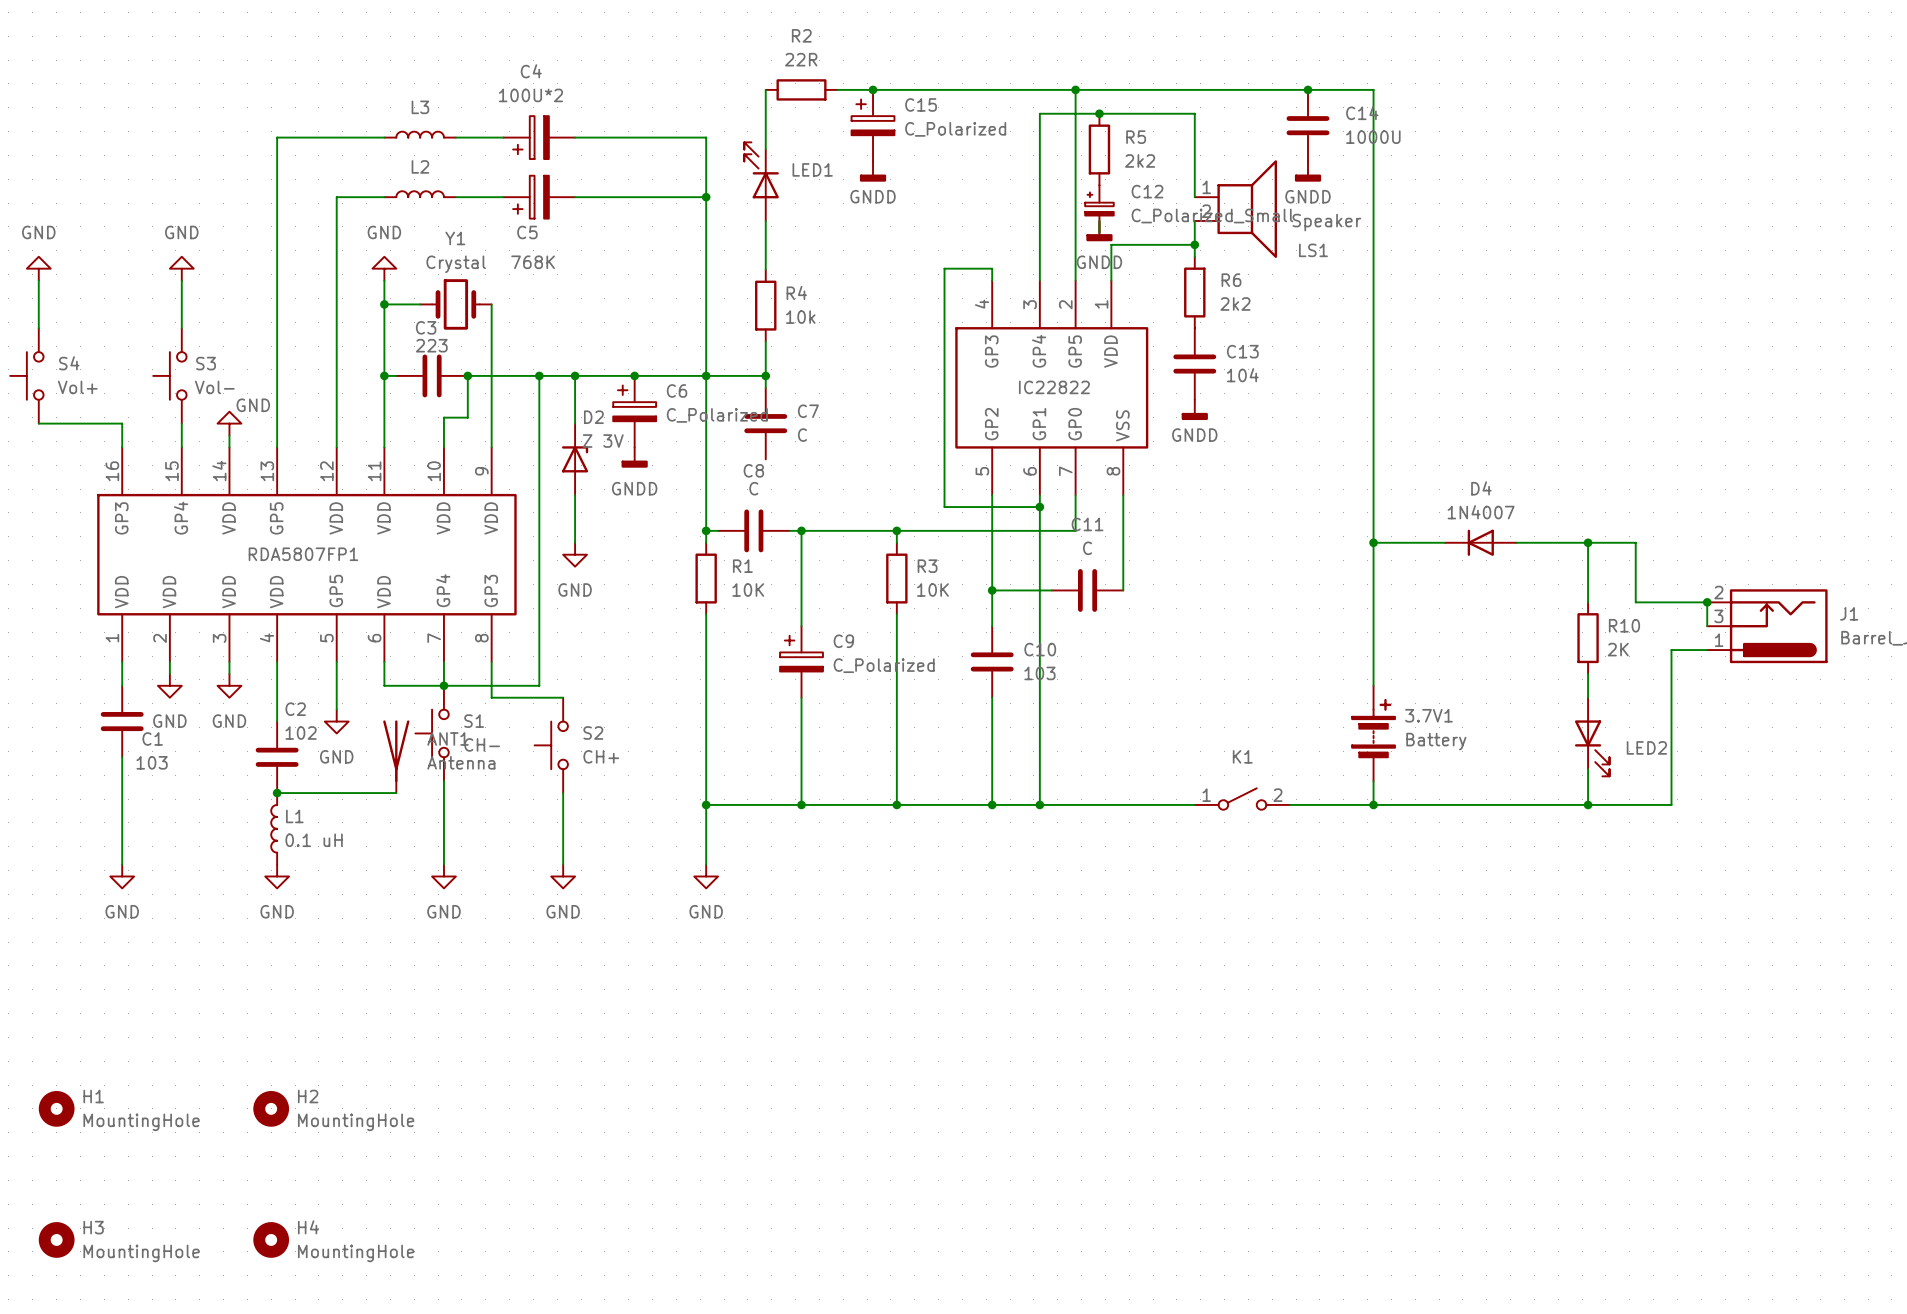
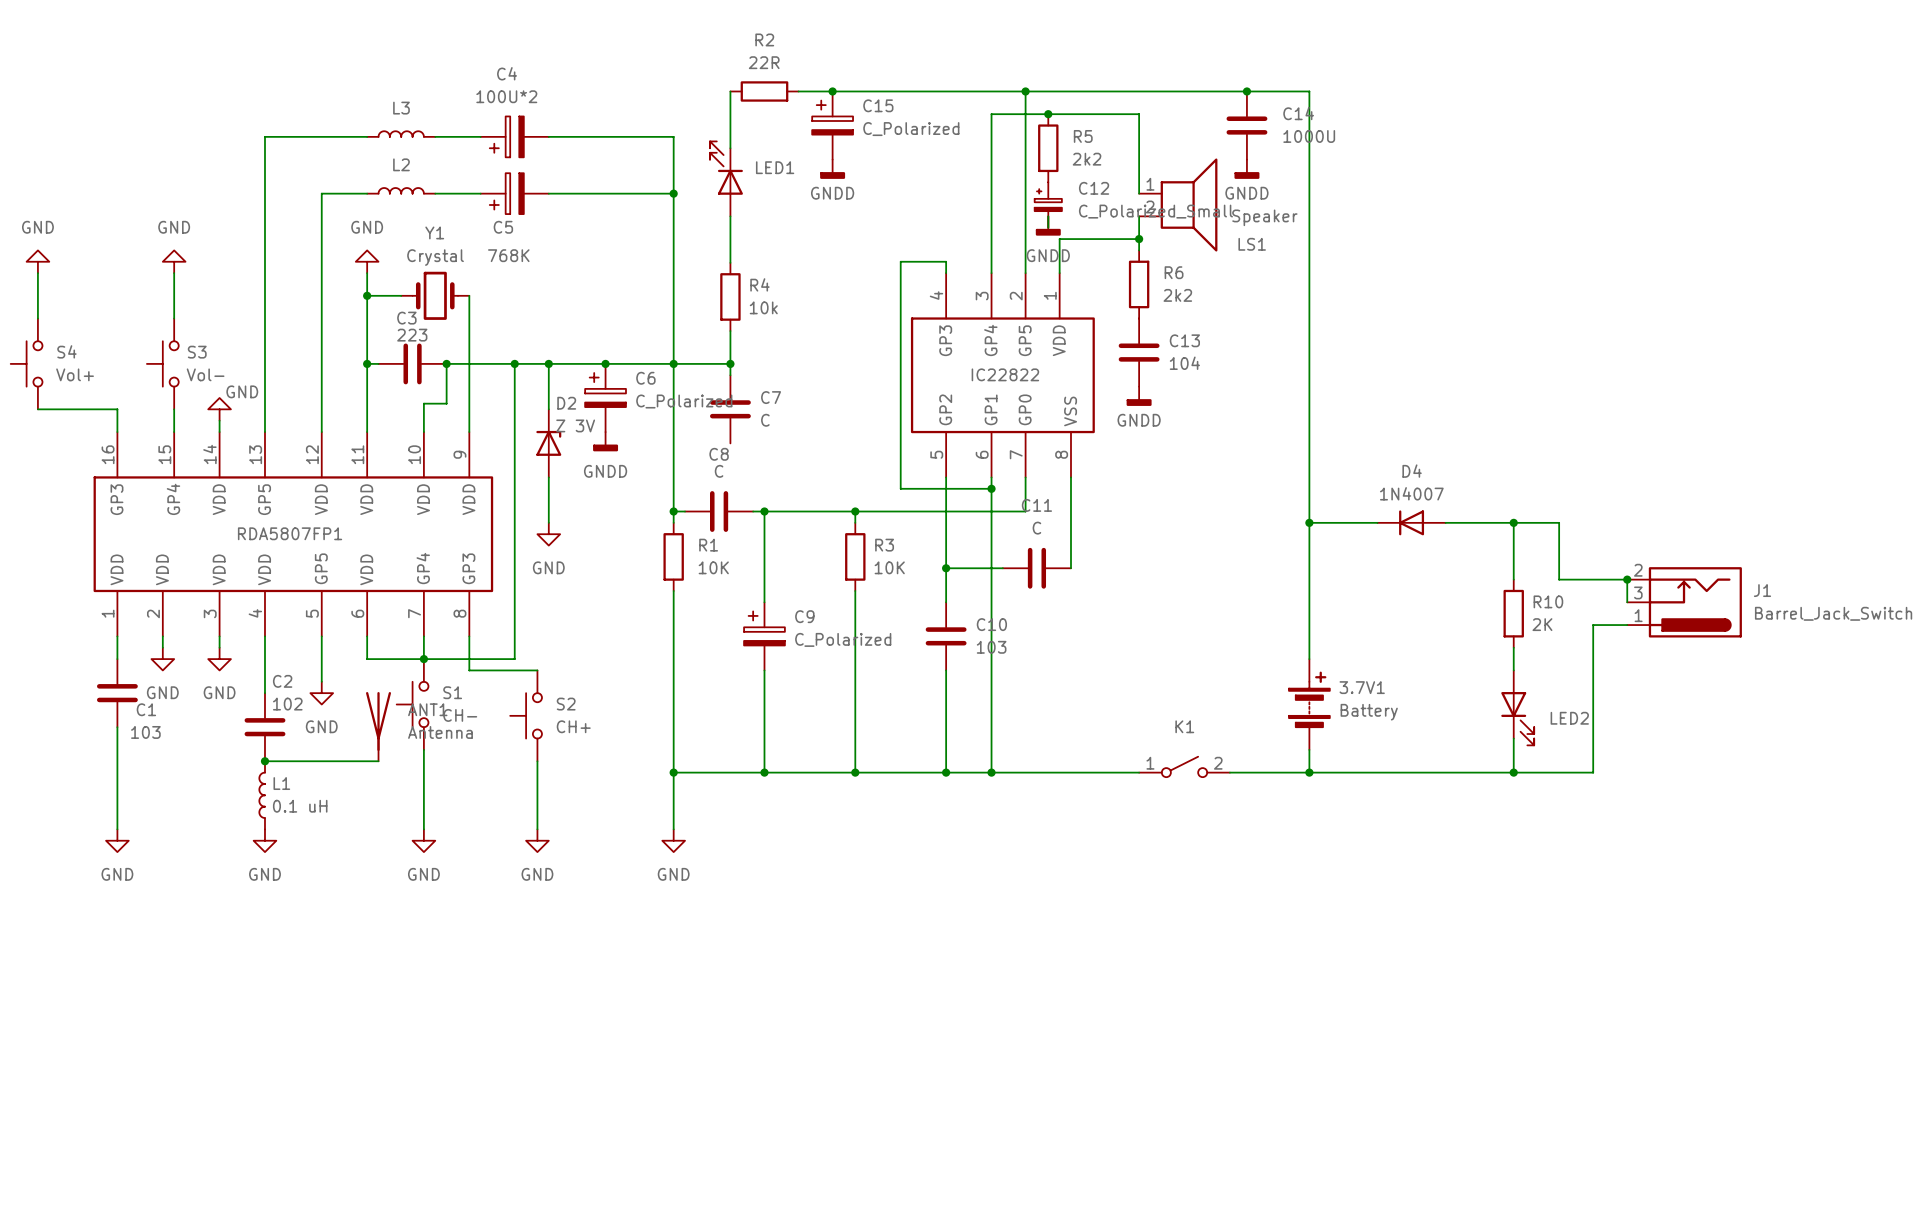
H1: MountingHole (56, 1108) -> none
H2: MountingHole (271, 1108) -> none
H3: MountingHole (56, 1239) -> none
H4: MountingHole (271, 1239) -> none

